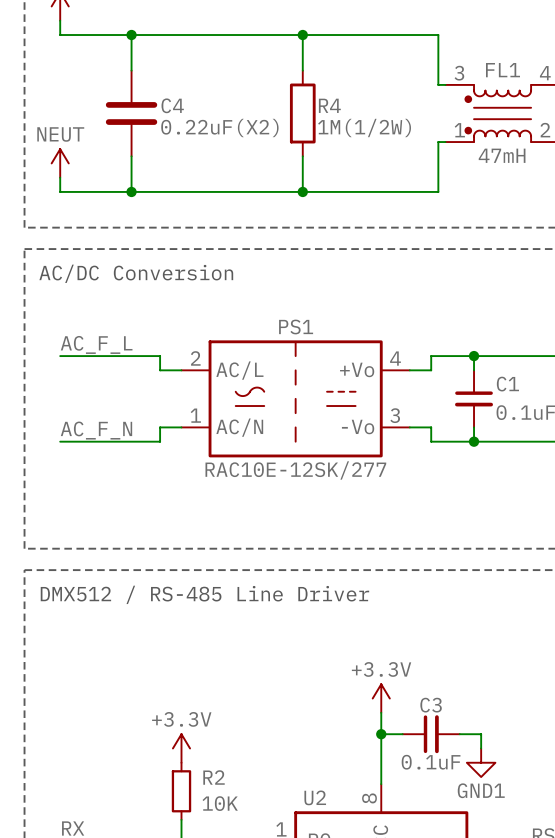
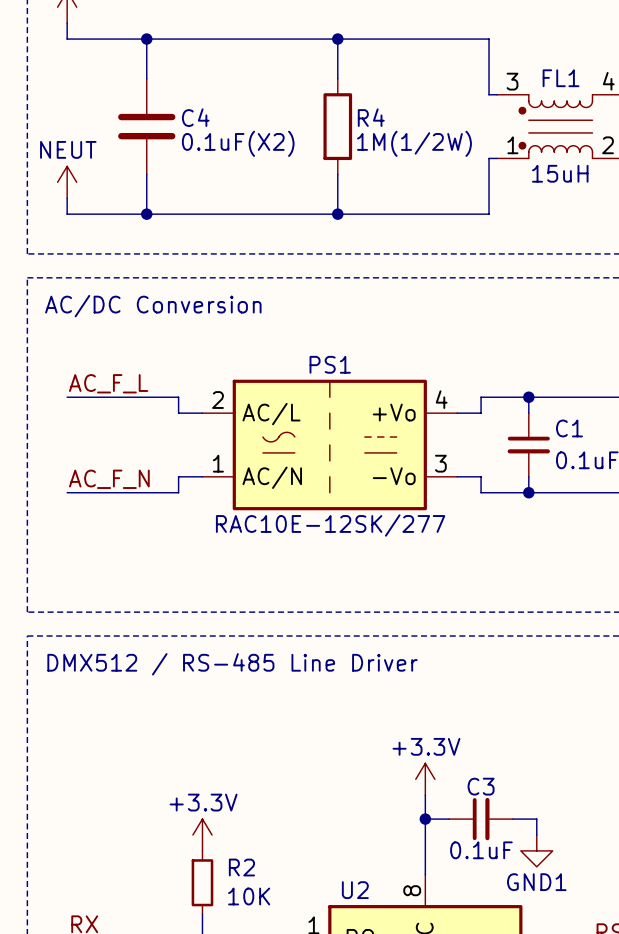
C4 value: 0.22uF(X2) (219, 128) -> 0.1uF(X2) (238, 143)
FL1 value: 47mH (502, 155) -> 15uH (560, 173)

